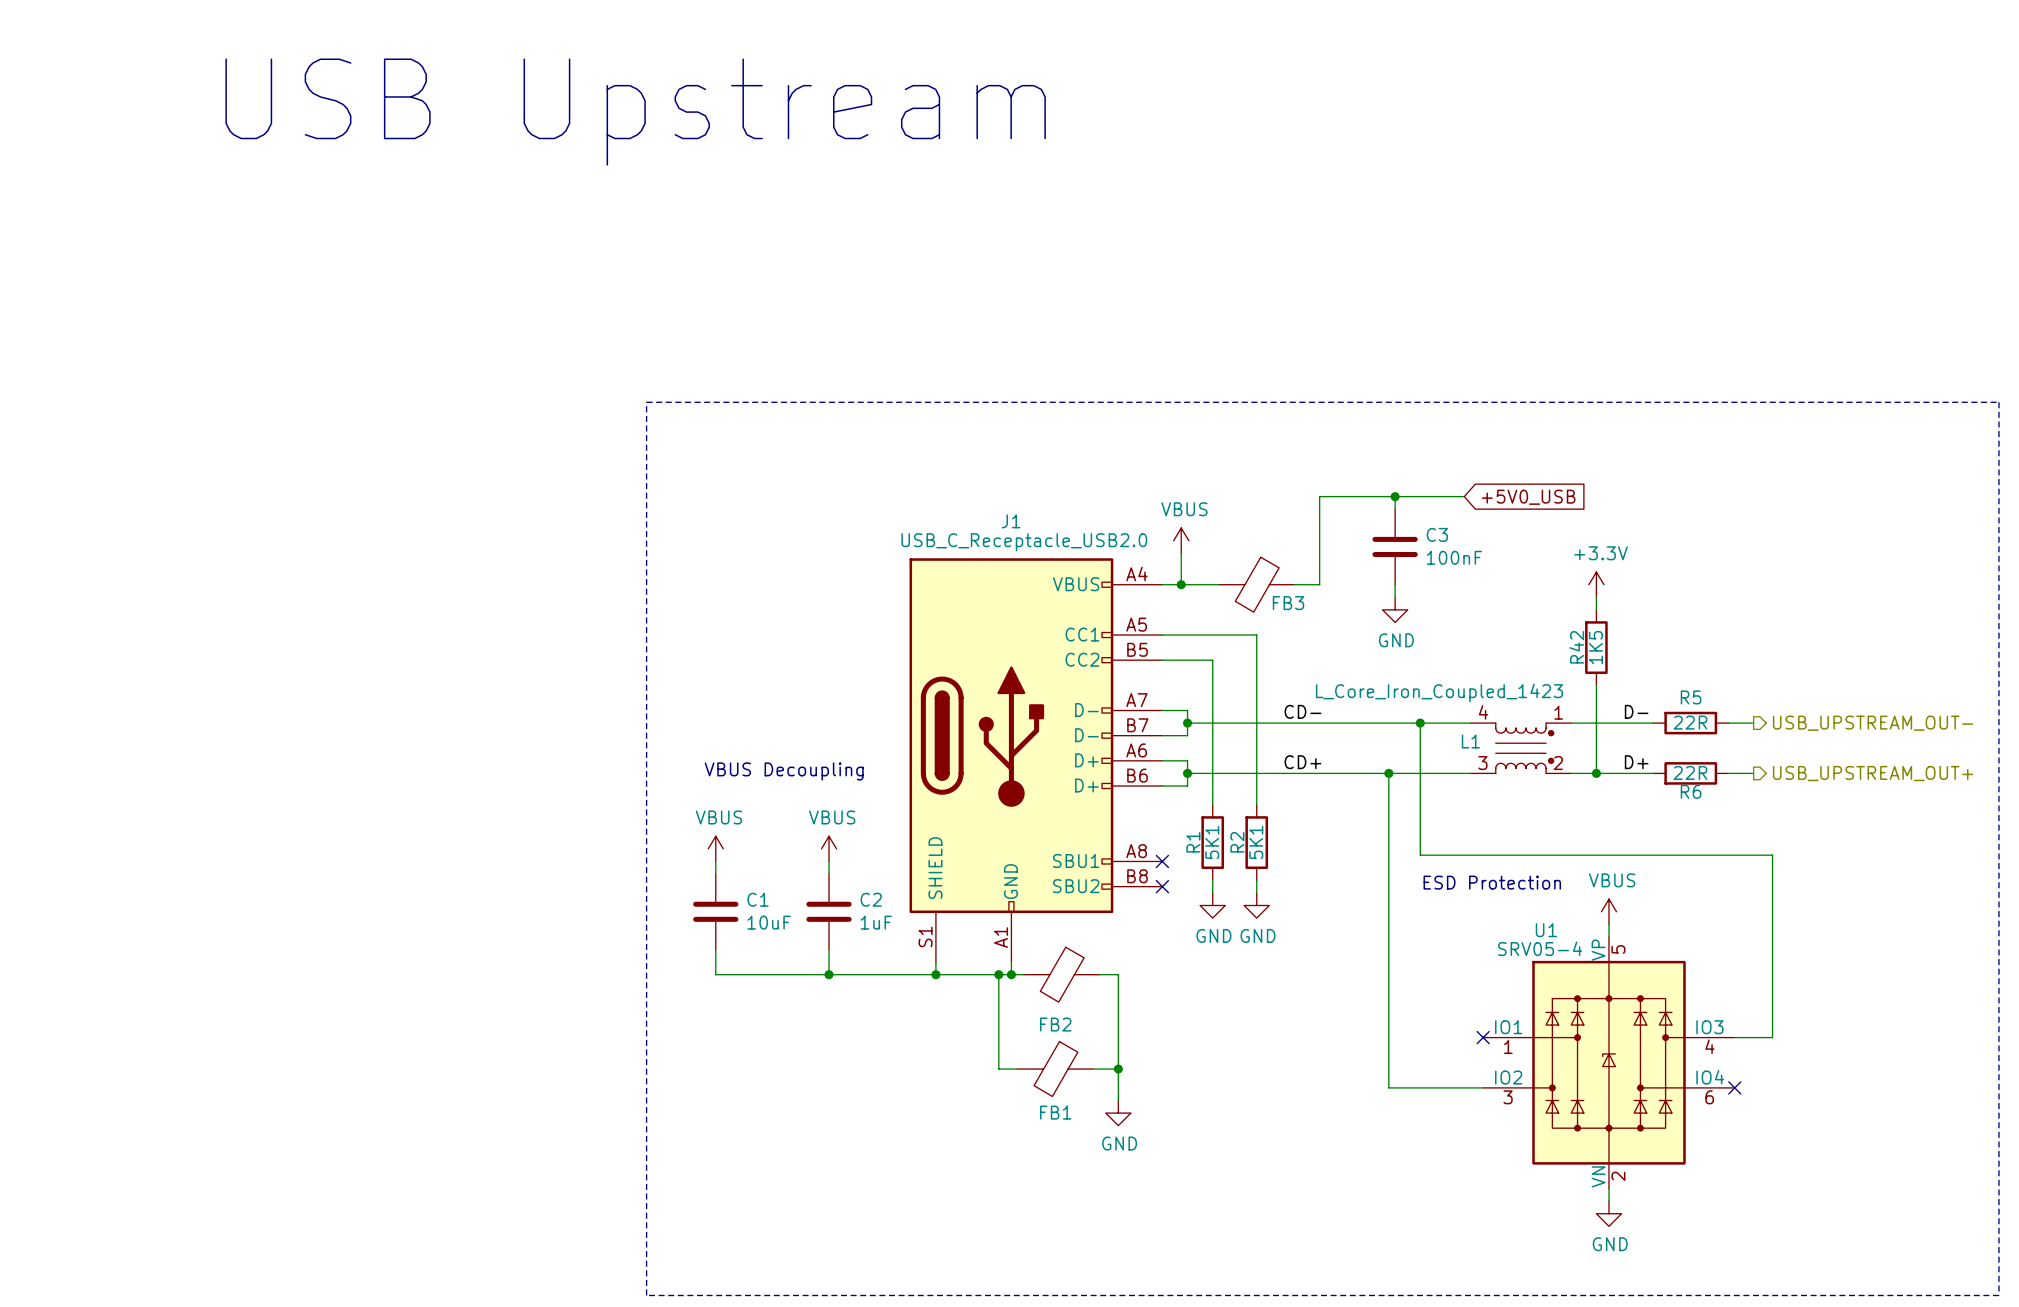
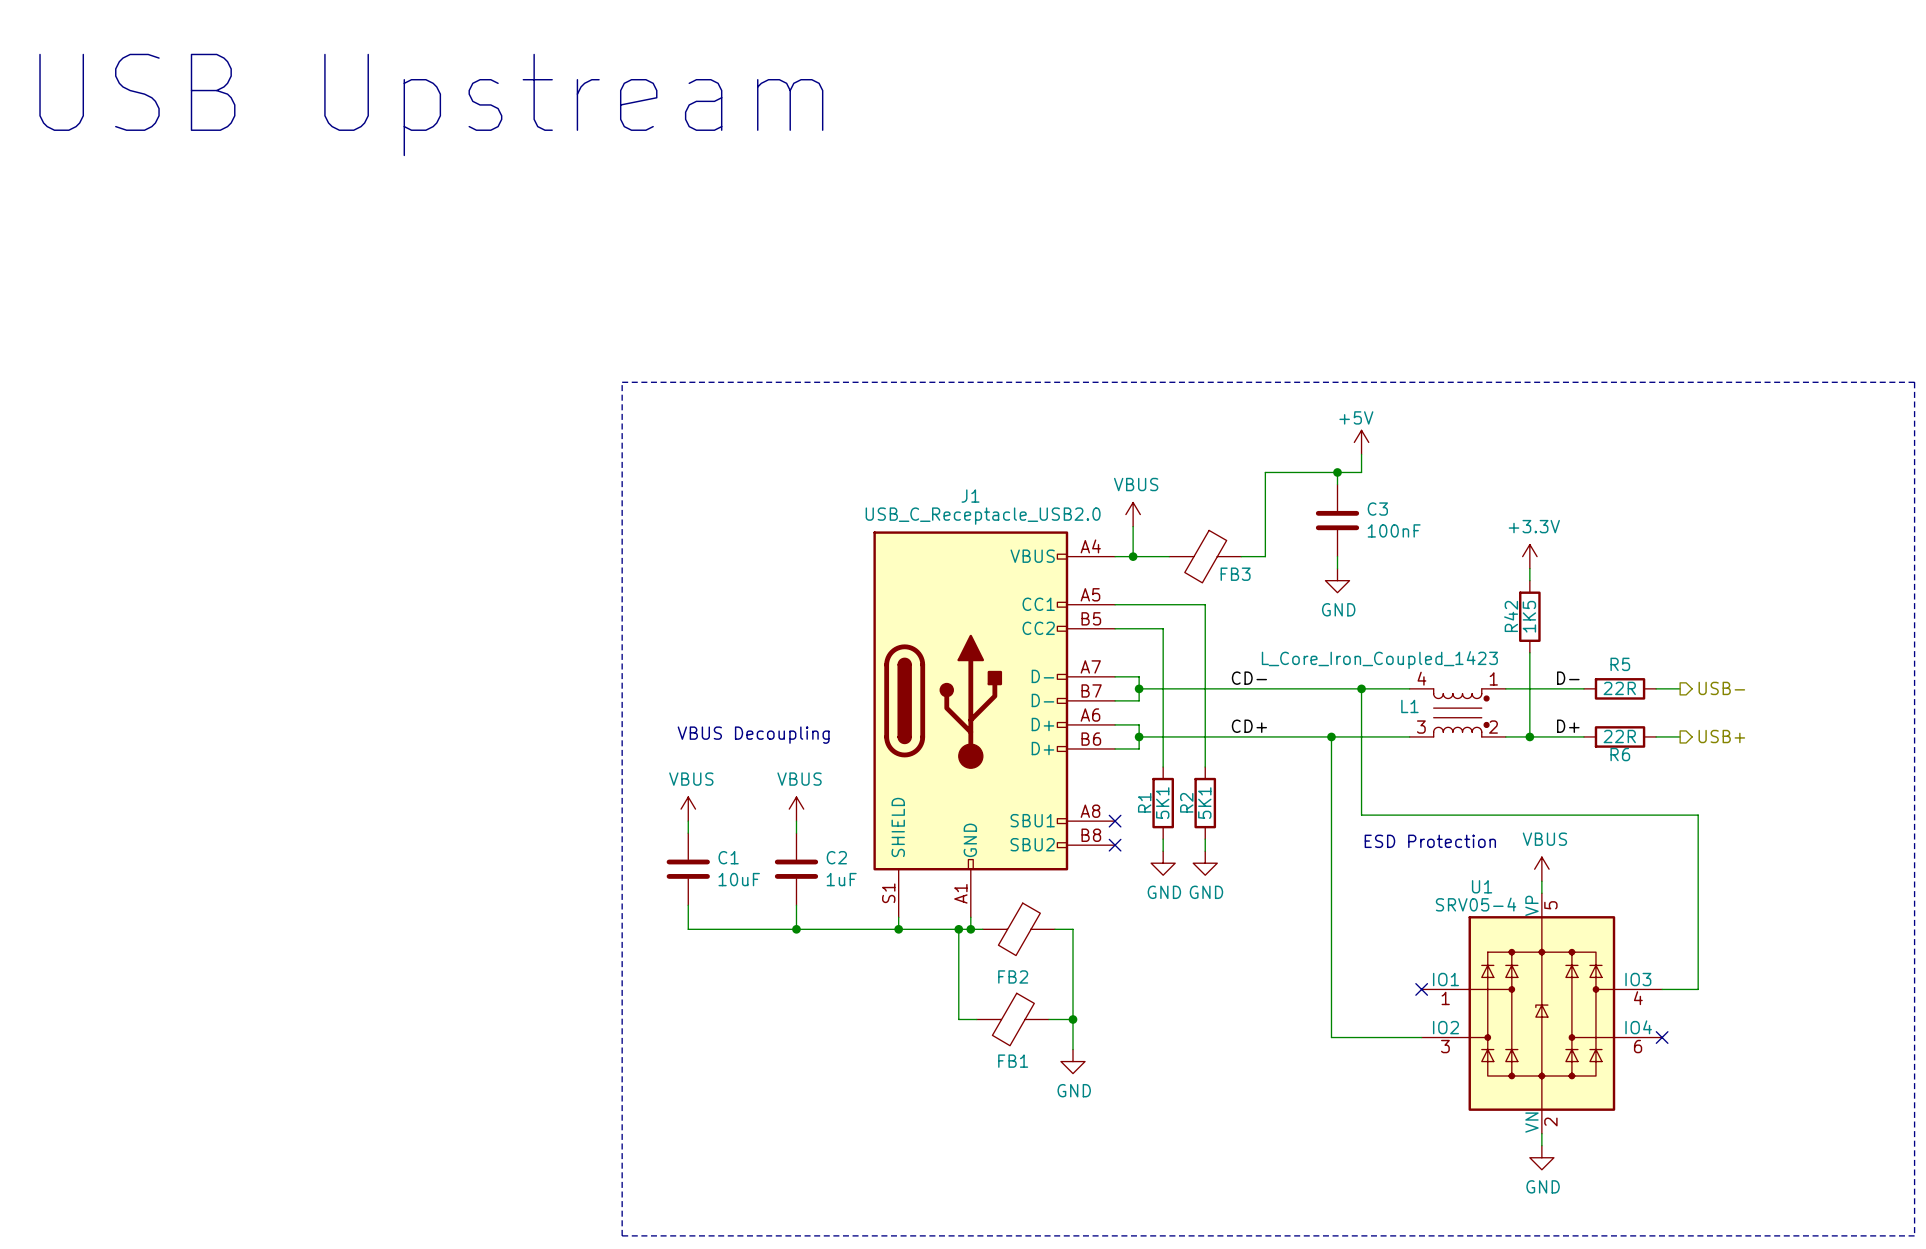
text position: USB Upstream (635, 112) -> USB Upstream (431, 104)
power symbol: none -> +5V (1361, 442)
wire: (1420, 496) (1464, 496) -> (1361, 472) (1361, 454)
global label: +5V0_USB (1528, 497) -> none
hierarchical label: USB_UPSTREAM_OUT- (1873, 723) -> USB- (1721, 688)
hierarchical label: USB_UPSTREAM_OUT+ (1873, 773) -> USB+ (1721, 736)

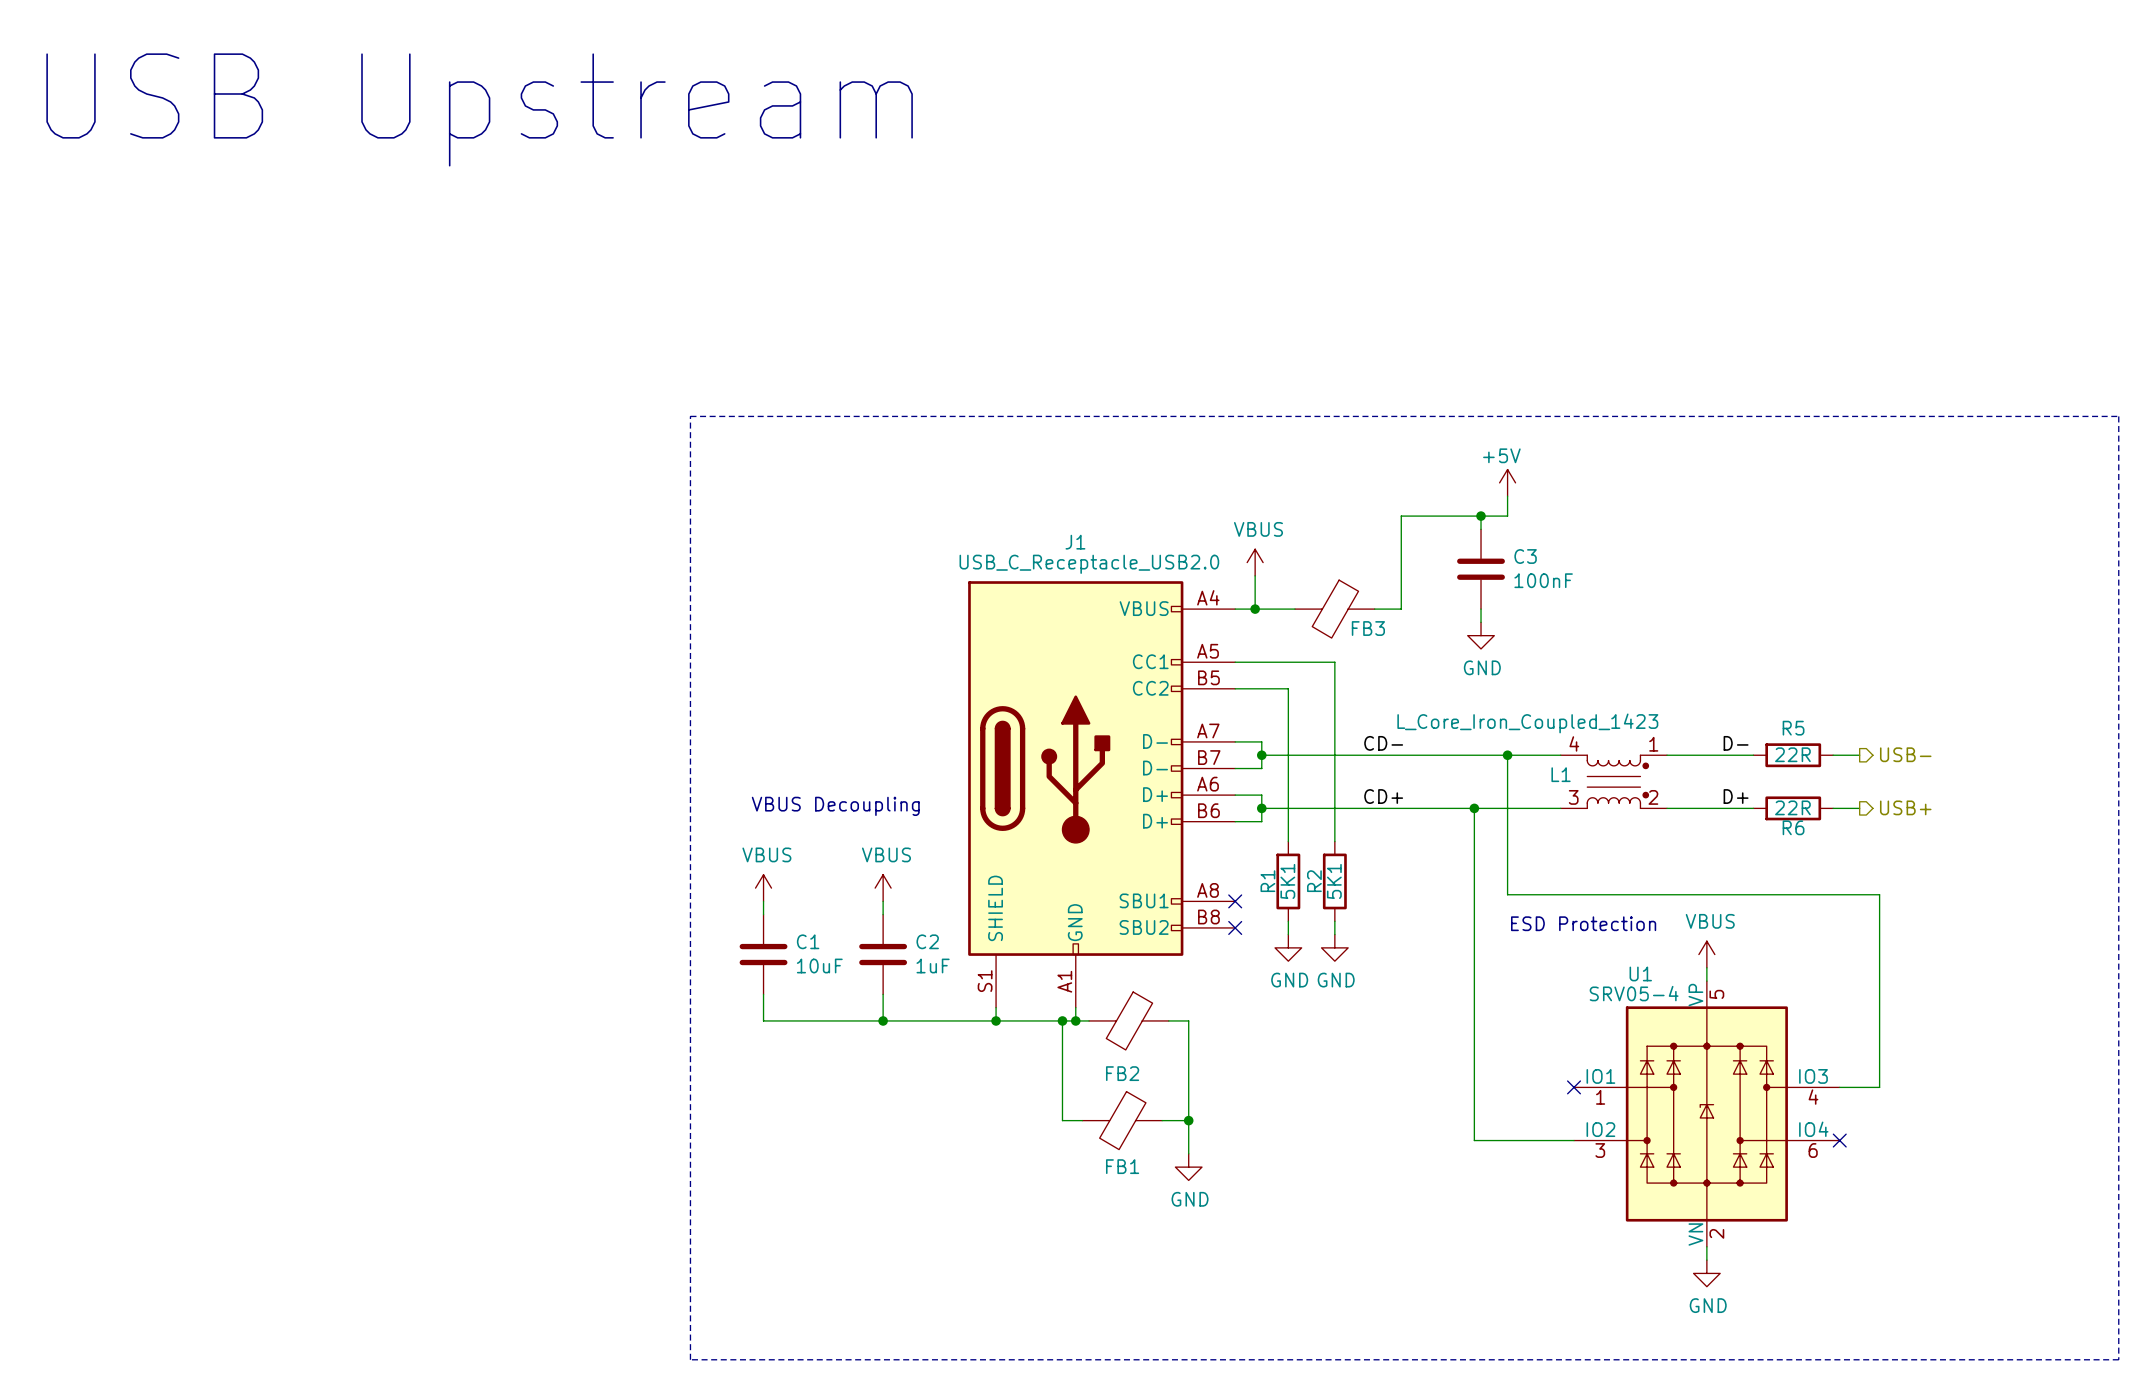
power symbol: +3.3V (1529, 556) -> none
wire: (1529, 568) (1529, 580) -> none
R42: 1K5 (1529, 616) -> none
wire: (1529, 652) (1529, 736) -> none
junction: (1529, 736) -> none

